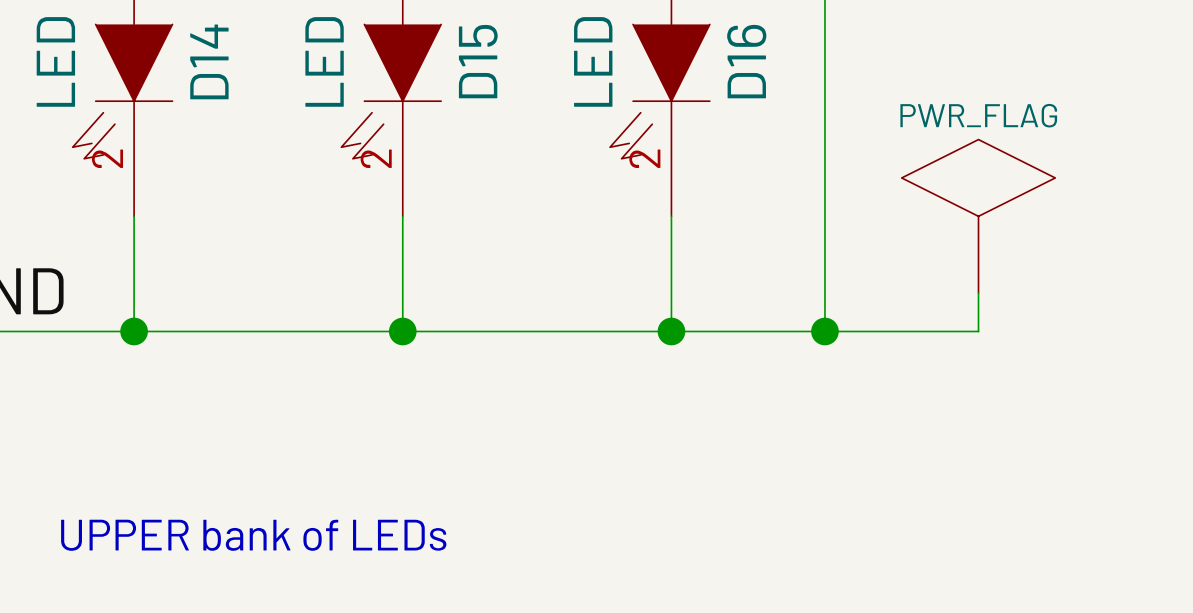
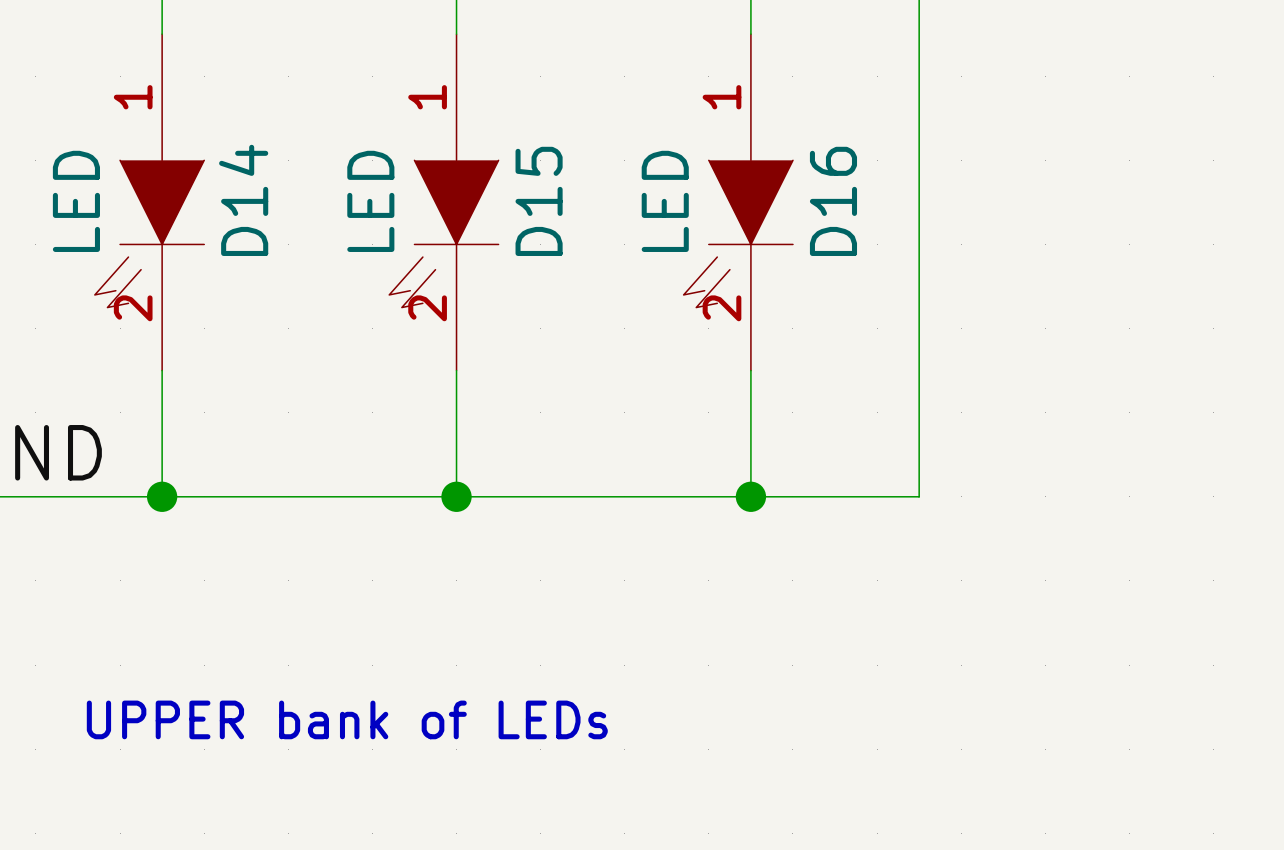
power symbol: PWR_FLAG (978, 216) -> none
wire: (978, 293) (978, 331) (824, 331) -> none
junction: (824, 331) -> none

